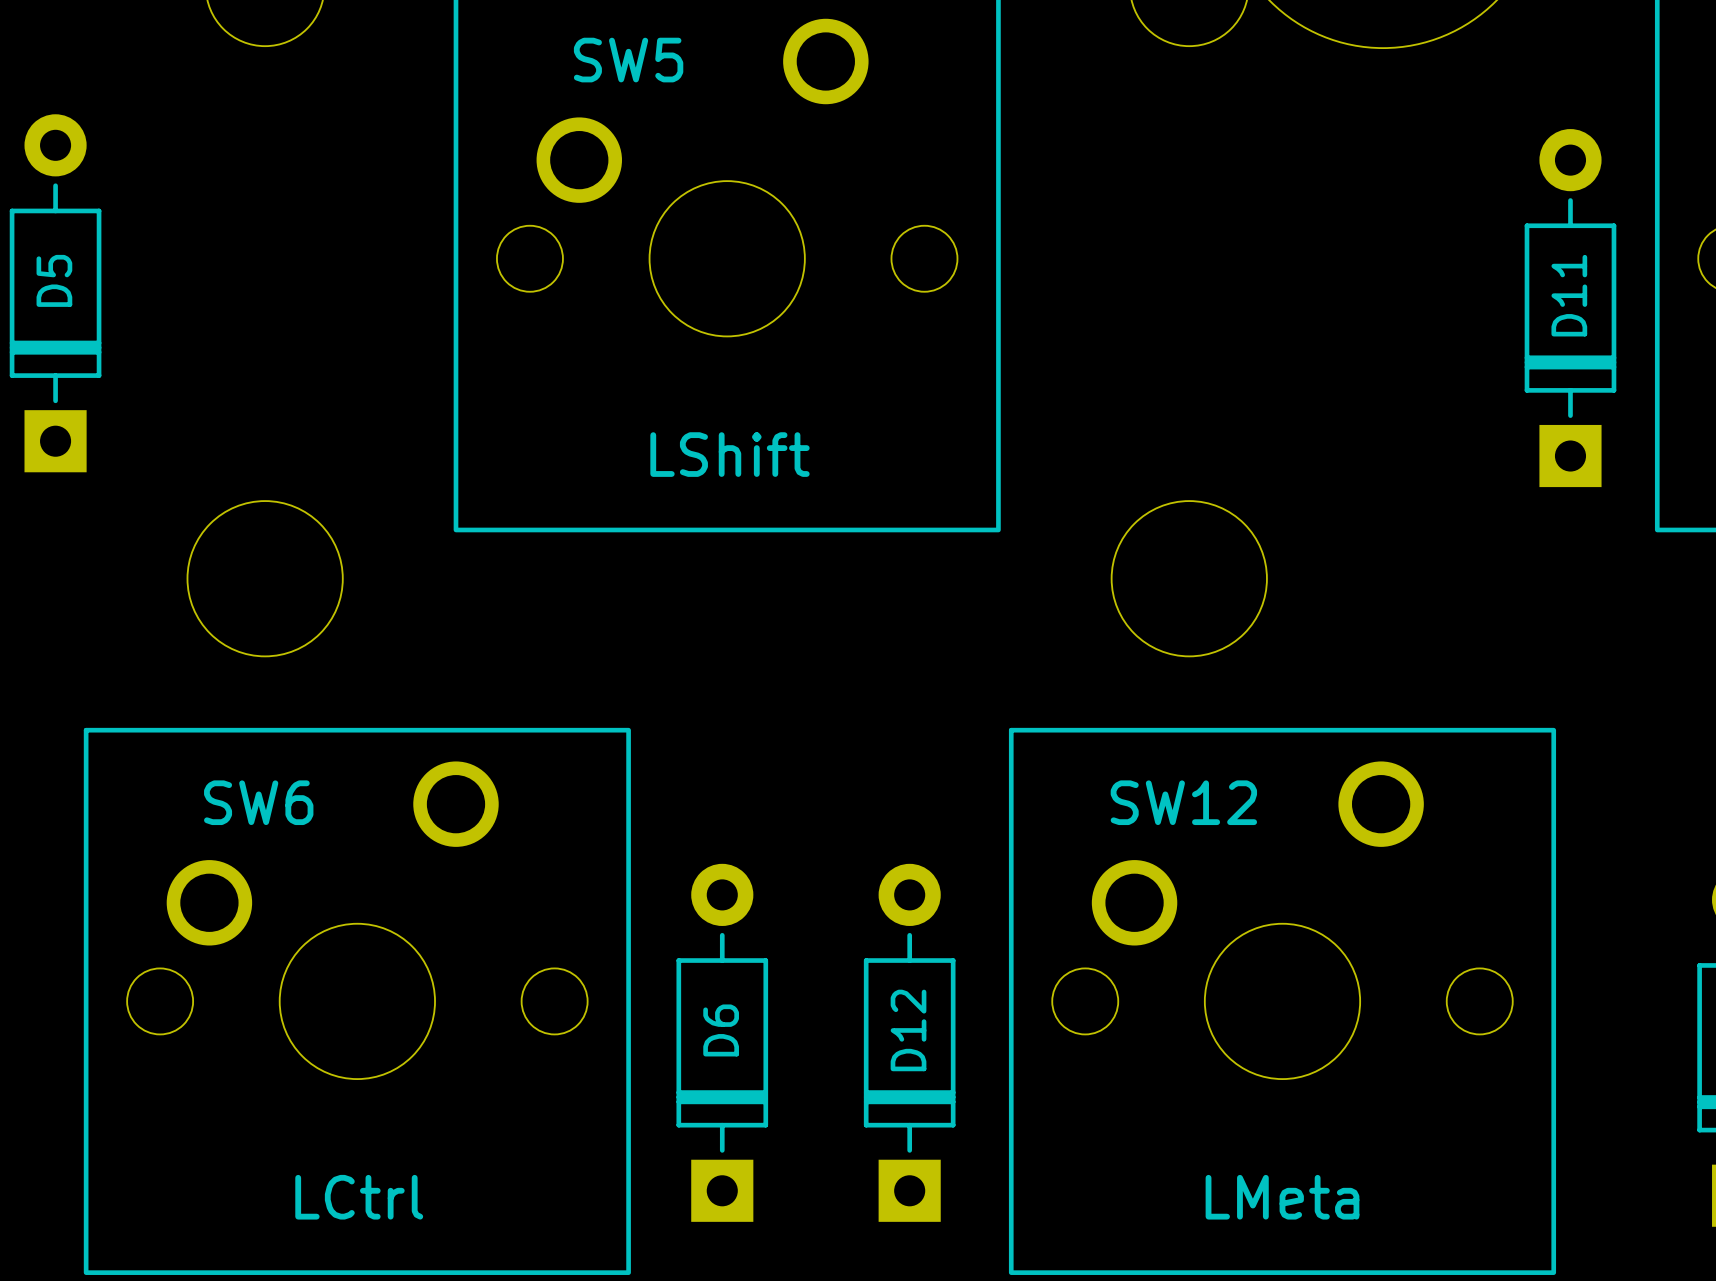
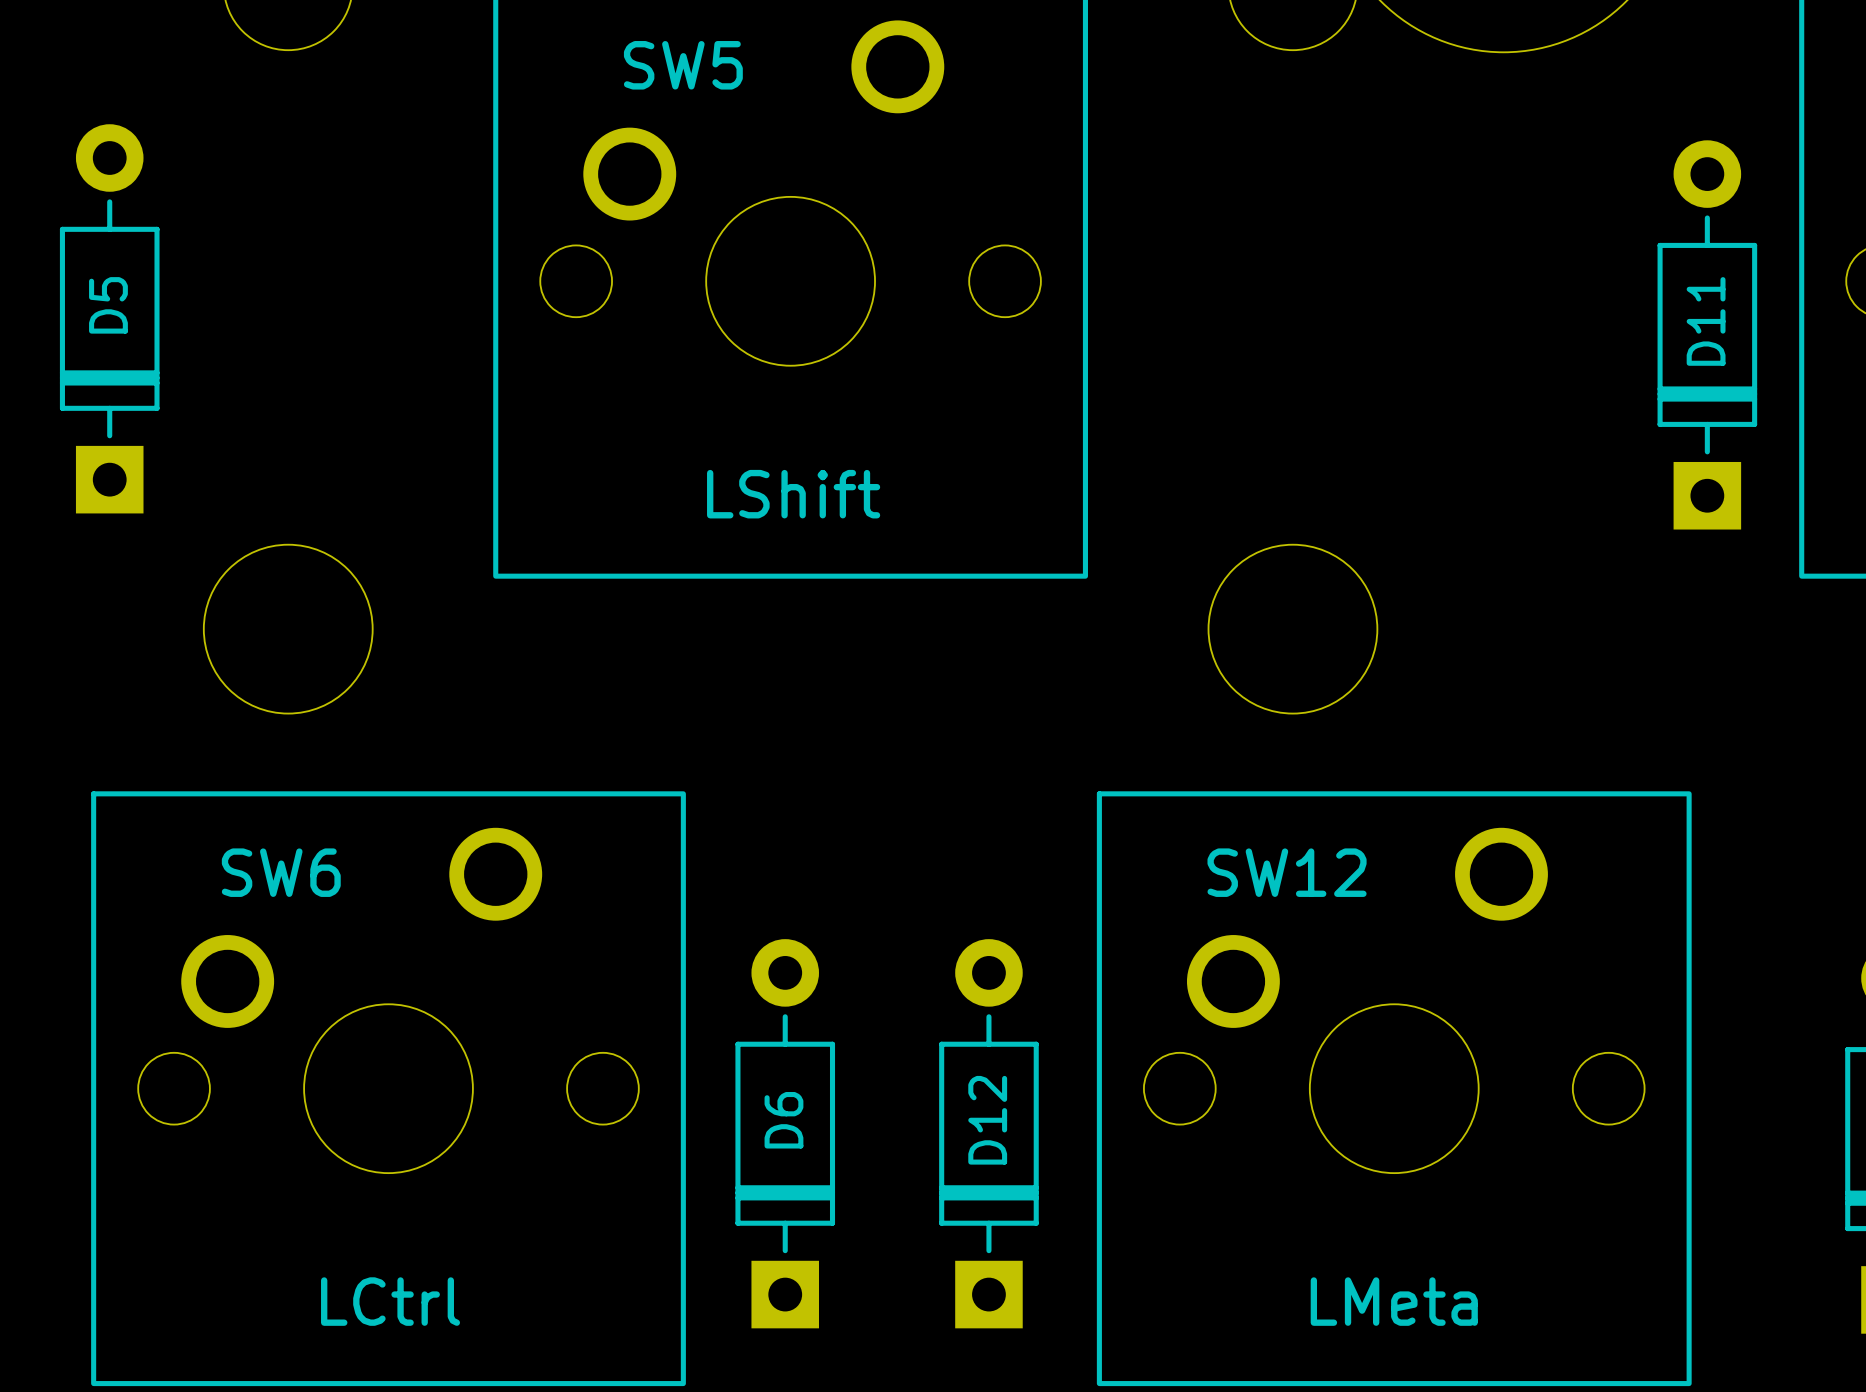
D5 position: (55, 293) -> (109, 318)

